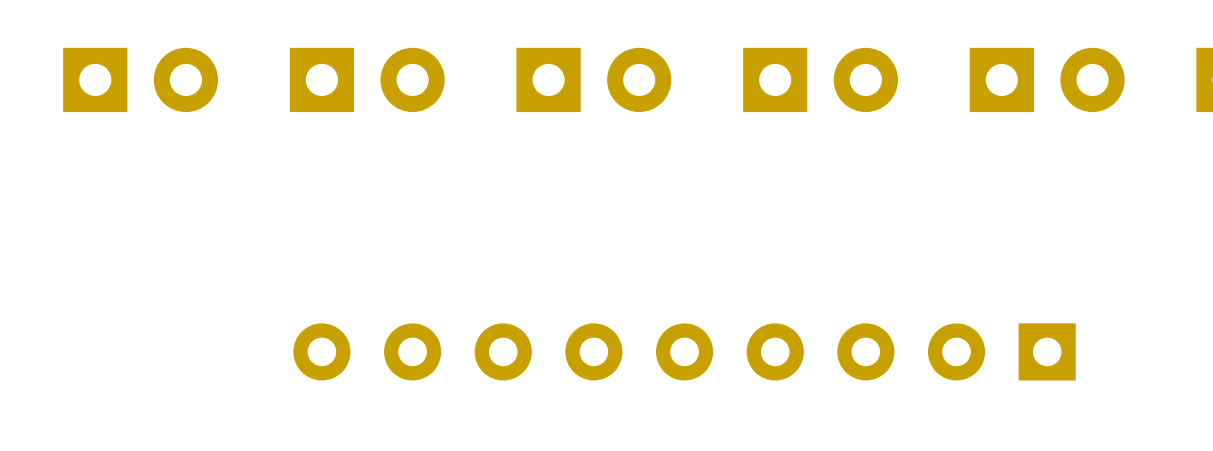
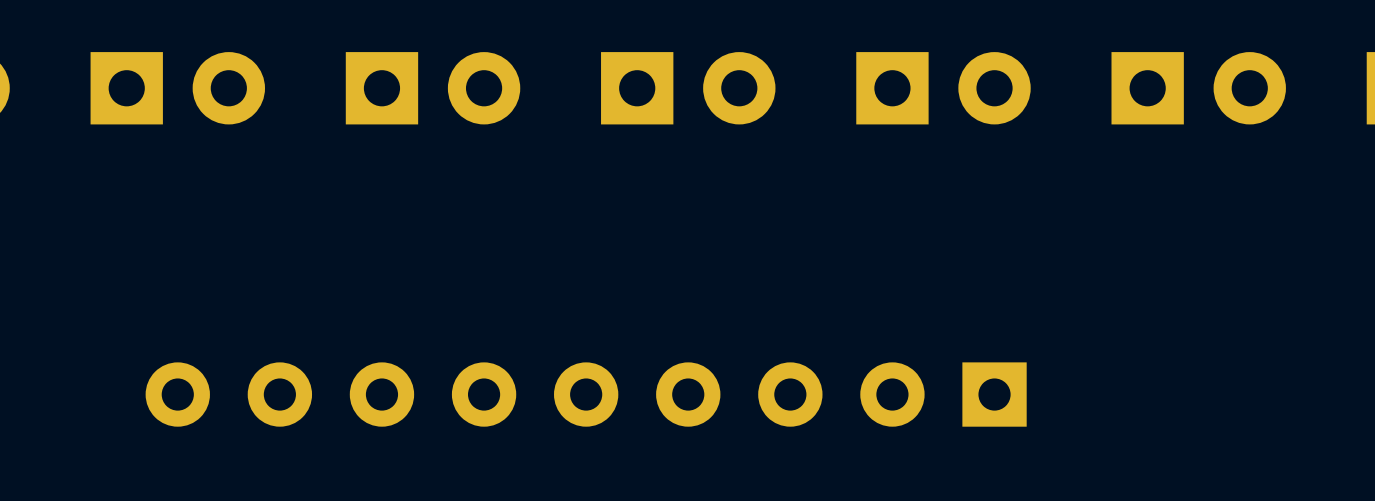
part position: (684, 351) -> (586, 394)

